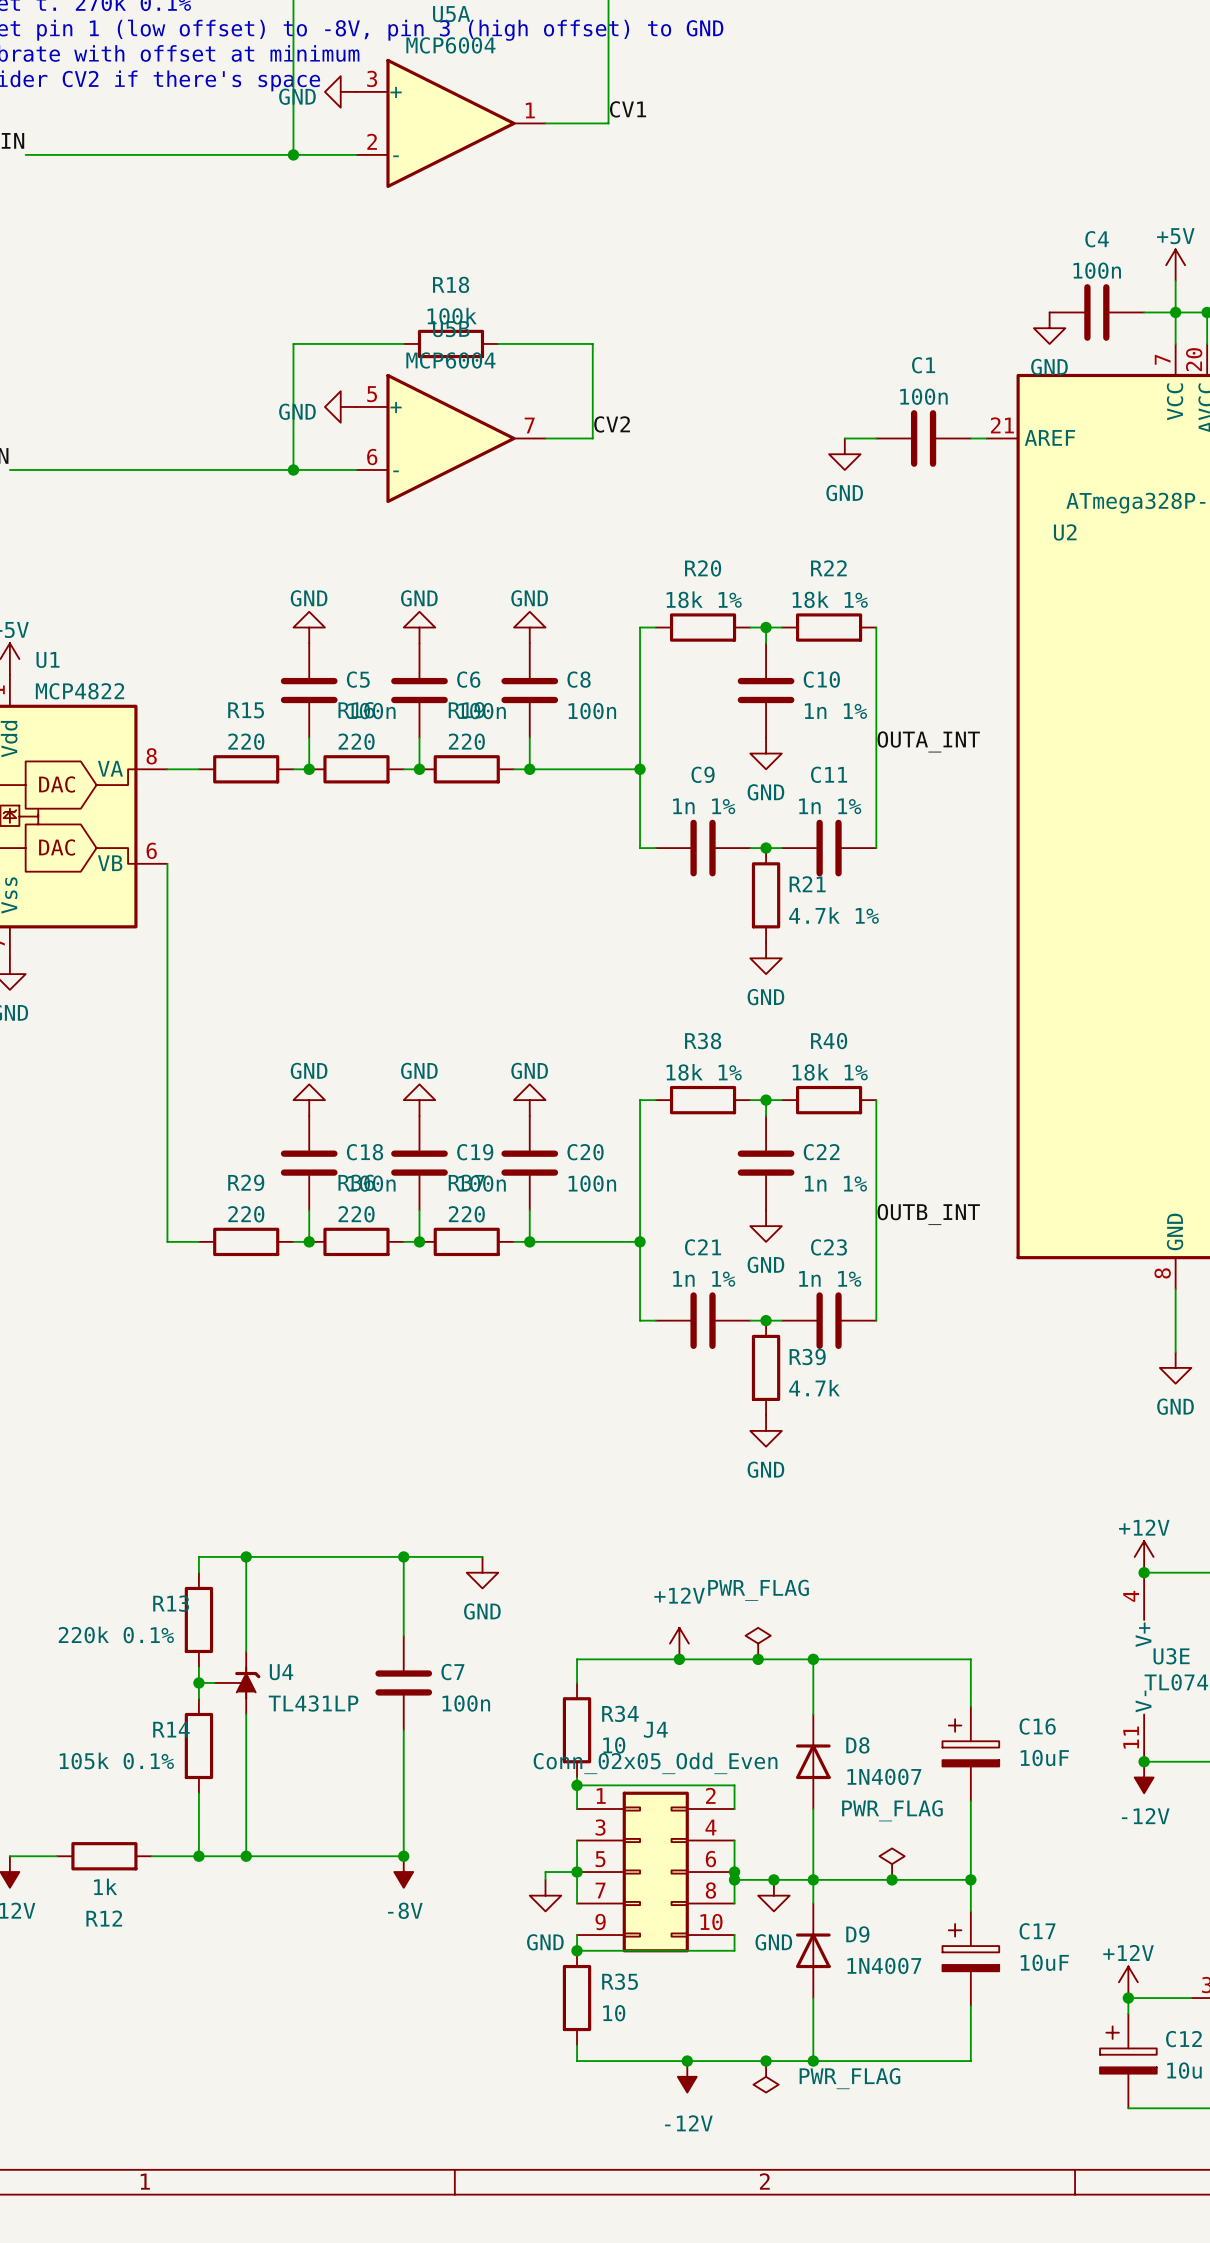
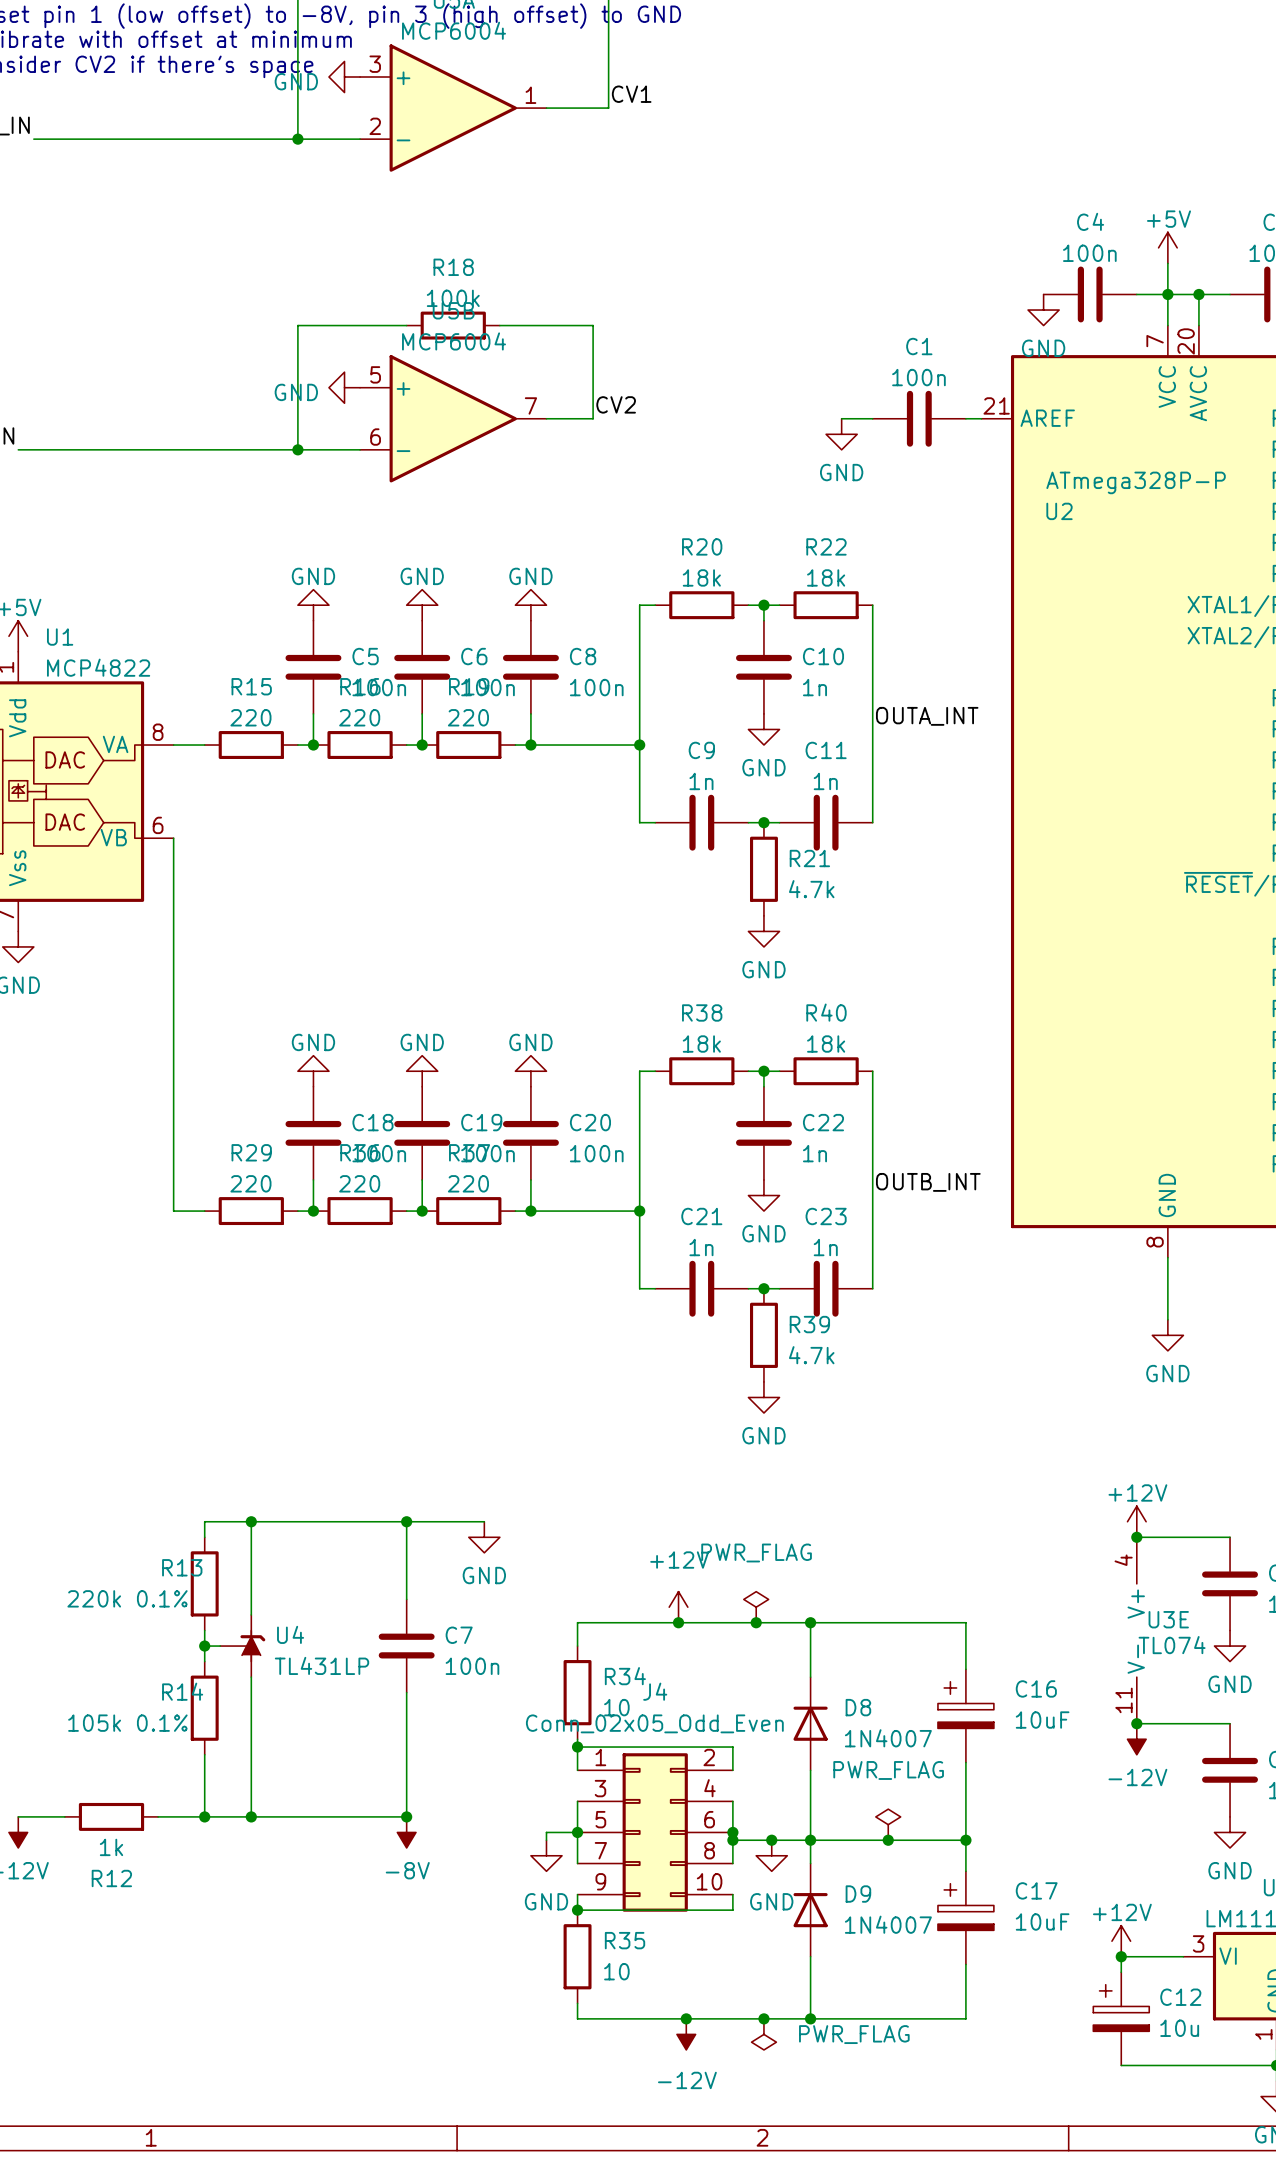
R20 value: 18k 1% (704, 599) -> 18k (701, 577)
R22 value: 18k 1% (830, 599) -> 18k (826, 577)
C10 value: 1n 1% (835, 711) -> 1n (814, 687)
C9 value: 1n 1% (704, 806) -> 1n (701, 781)
C11 value: 1n 1% (830, 806) -> 1n (825, 781)
R21 value: 4.7k 1% (834, 915) -> 4.7k (811, 889)
R38 value: 18k 1% (704, 1072) -> 18k (701, 1044)
R40 value: 18k 1% (830, 1072) -> 18k (826, 1044)
C22 value: 1n 1% (835, 1183) -> 1n (814, 1153)
C21 value: 1n 1% (704, 1278) -> 1n (701, 1247)
C23 value: 1n 1% (830, 1278) -> 1n (825, 1247)

